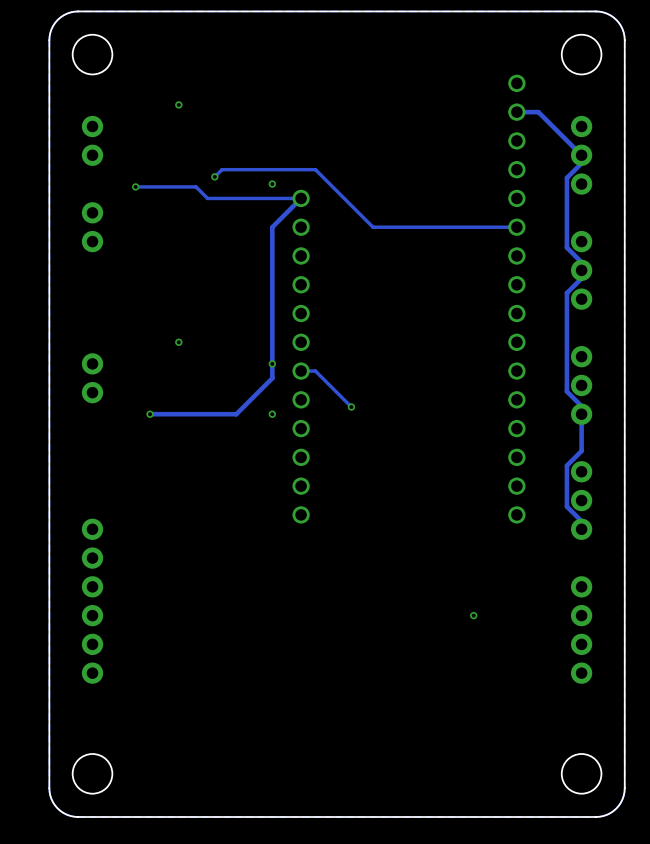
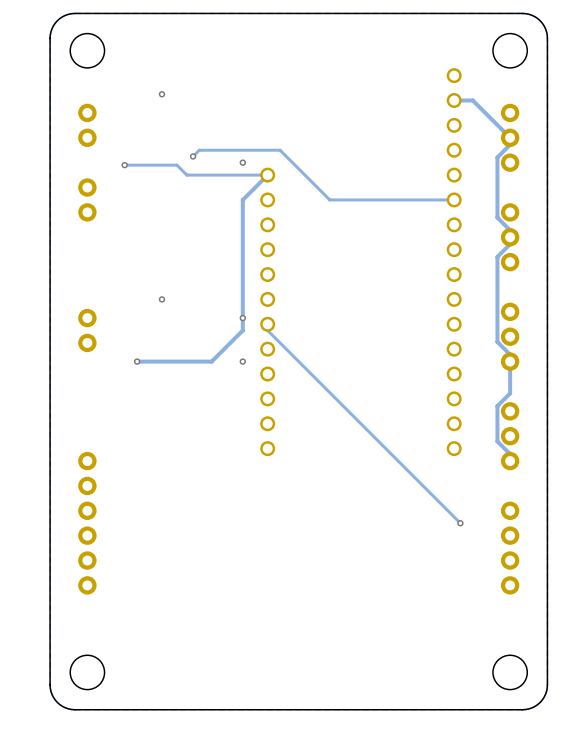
track: (301, 371) (315, 371) (351, 407) -> (267, 324) (267, 330) (460, 523)
via: (351, 407) -> none
via position: (473, 615) -> (460, 523)

